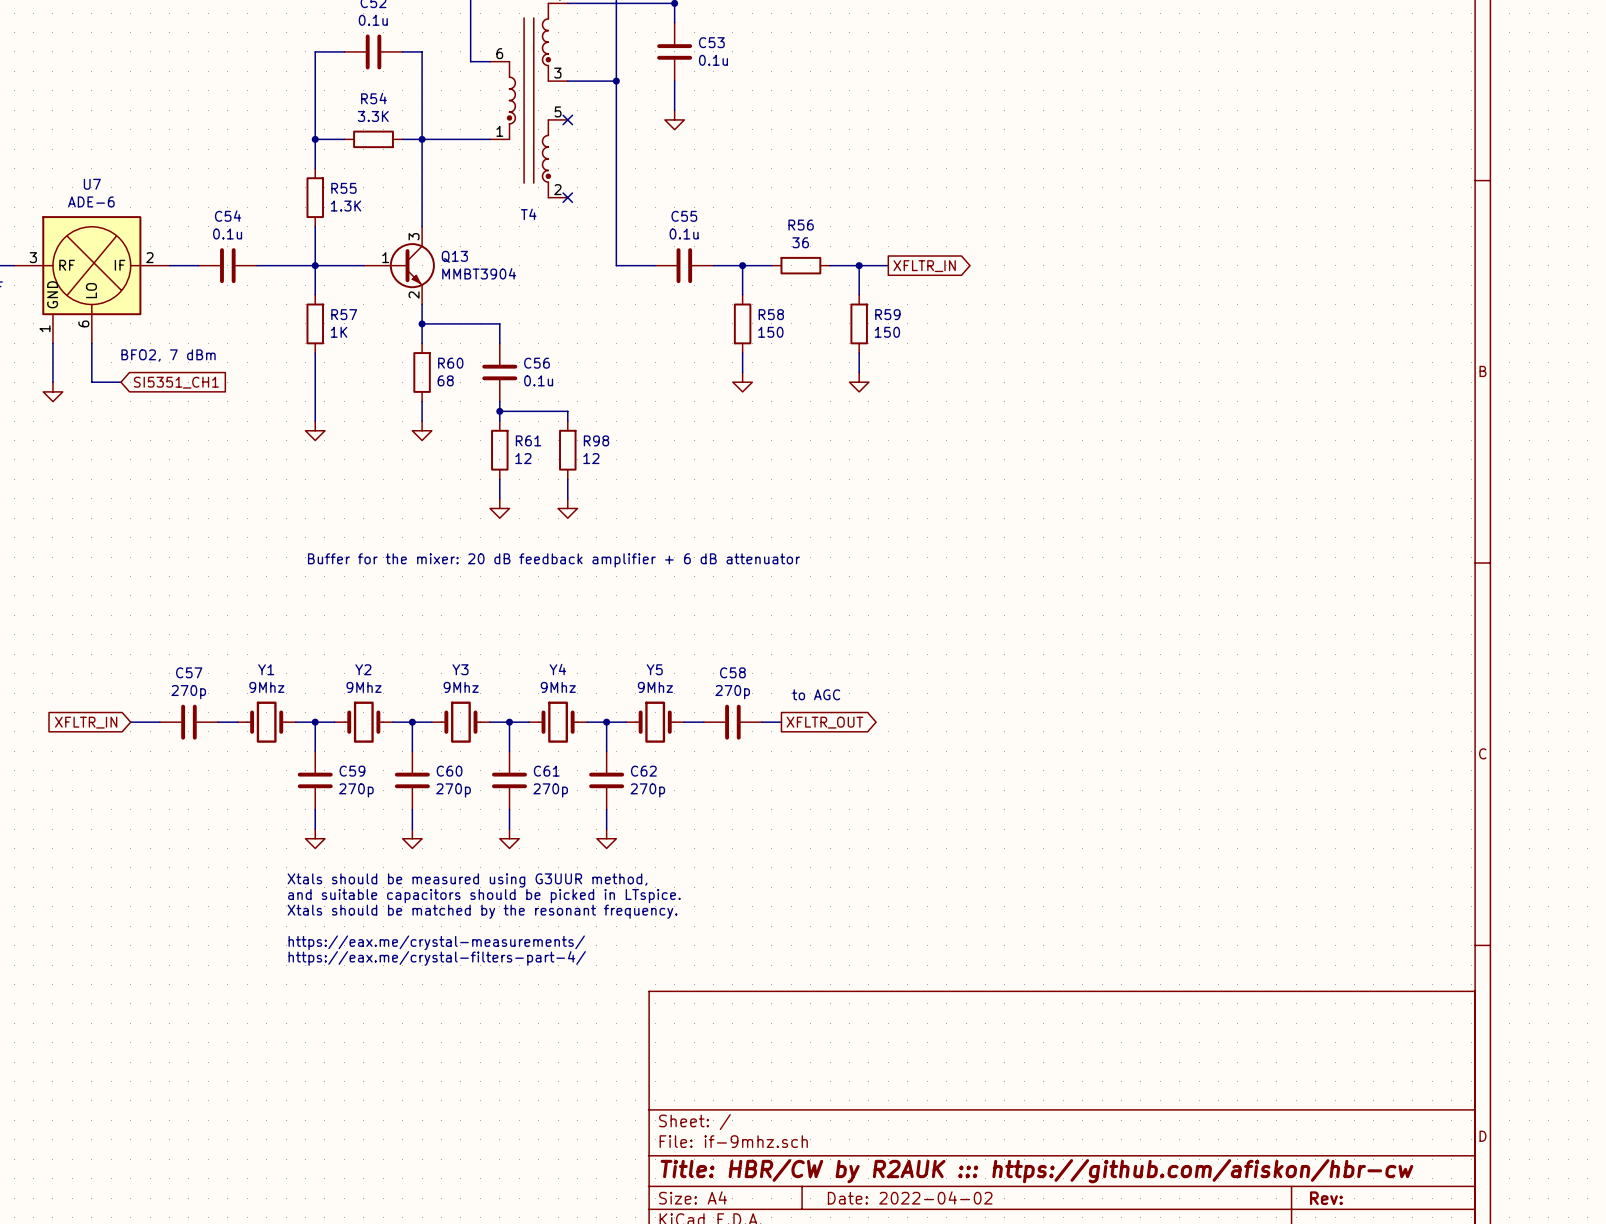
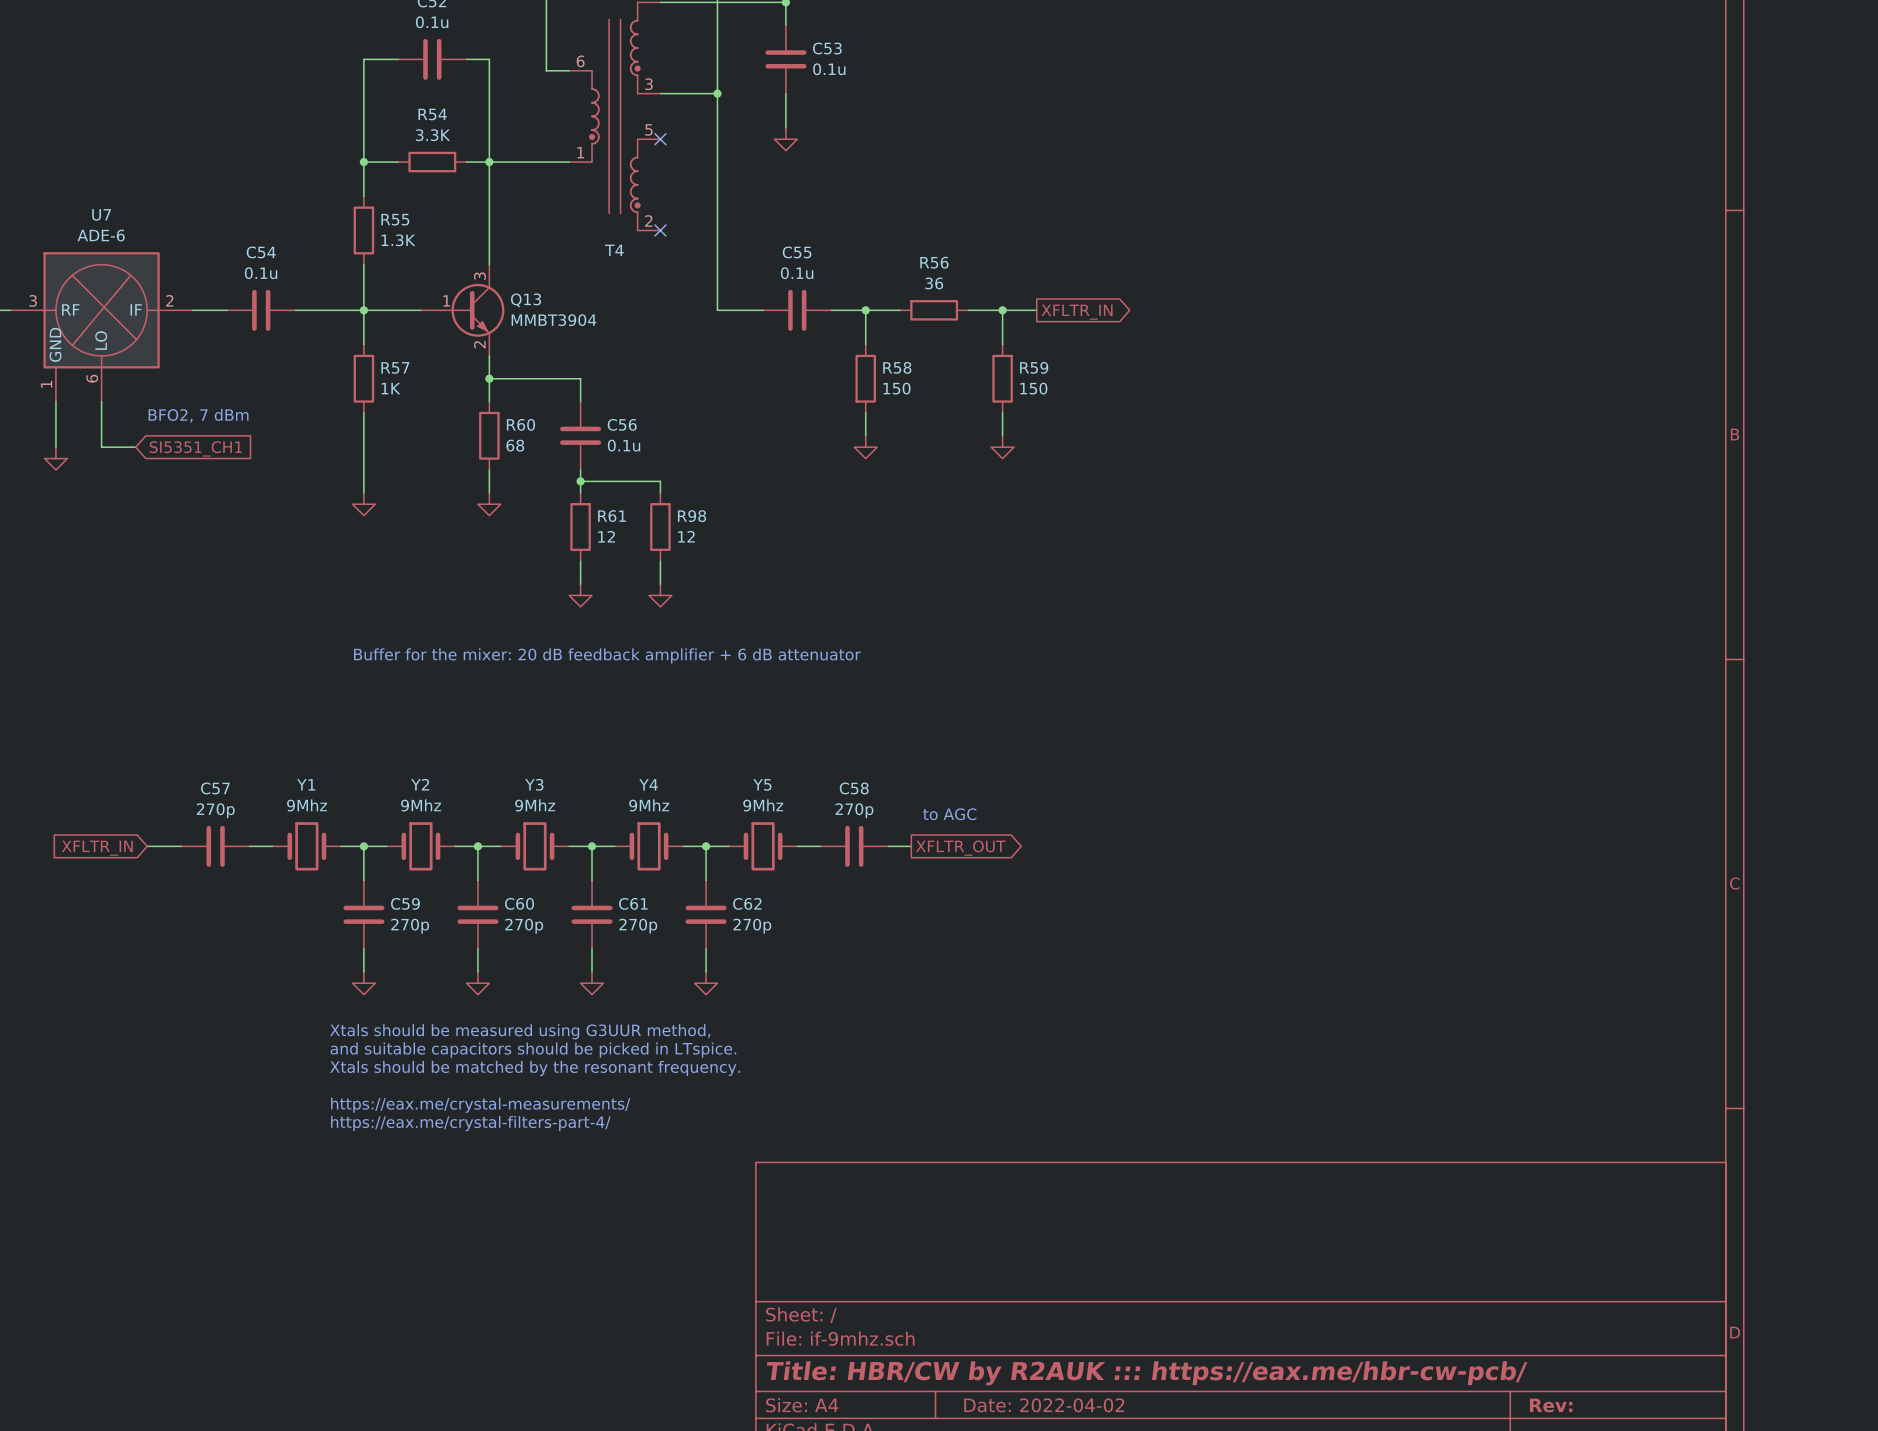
title block: Title: HBR/CW by R2AUK ::: https://github.com/afiskon/hbr-cw (1036, 1171) -> Title: HBR/CW by R2AUK ::: https://eax.me/hbr-cw-pcb/ (1147, 1373)

